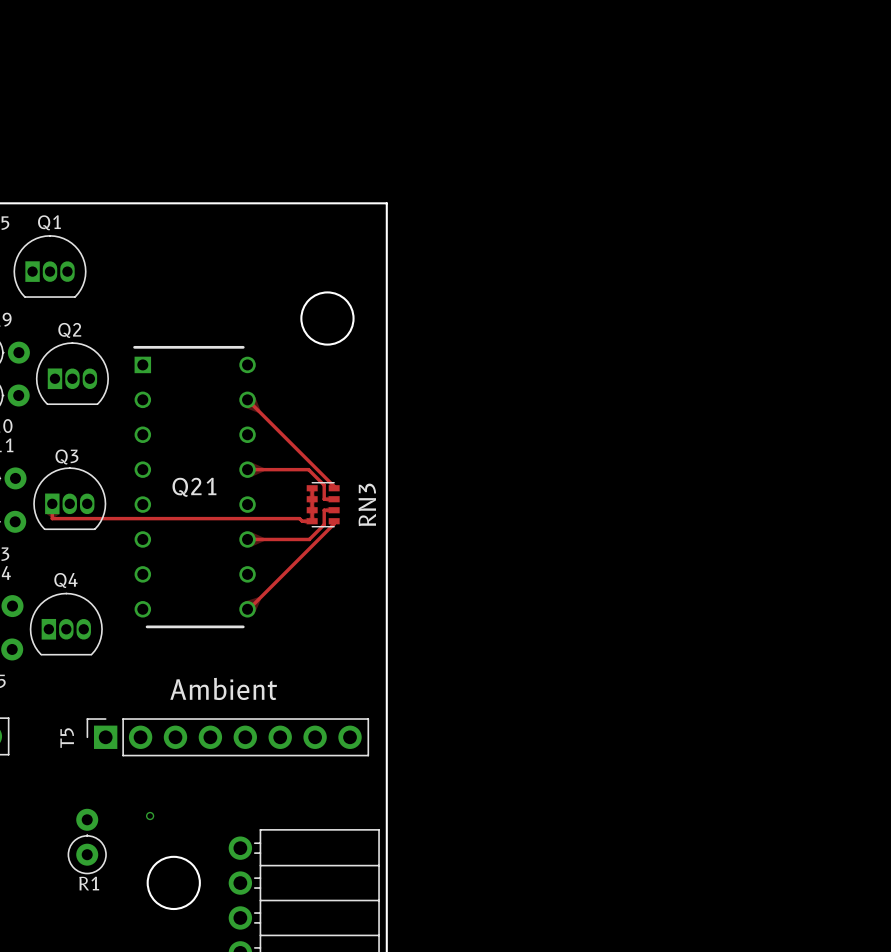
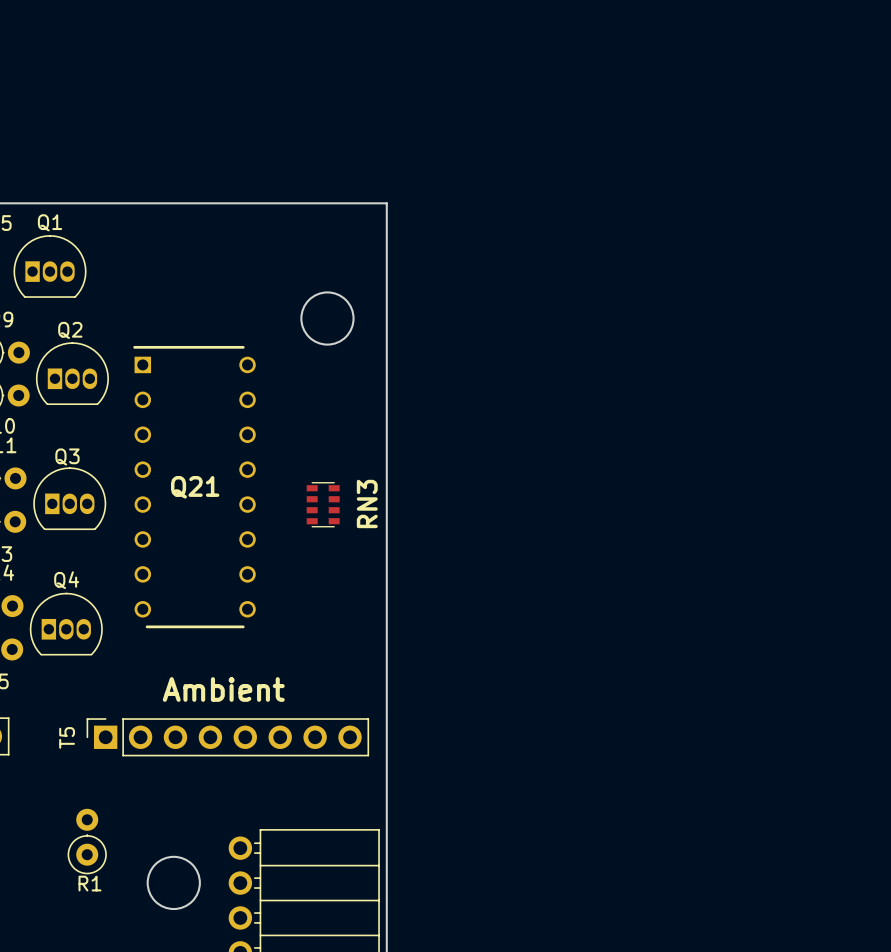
track: (247, 399) (334, 488) -> none
track: (247, 469) (308, 469) (324, 485) (324, 499) (334, 499) -> none
track: (312, 488) (312, 521) (302, 521) (299, 518) (52, 518) (52, 503) -> none
track: (334, 510) (324, 510) (324, 524) (309, 539) (247, 539) -> none
track: (334, 521) (334, 523) (248, 609) -> none
via: (150, 816) -> none

